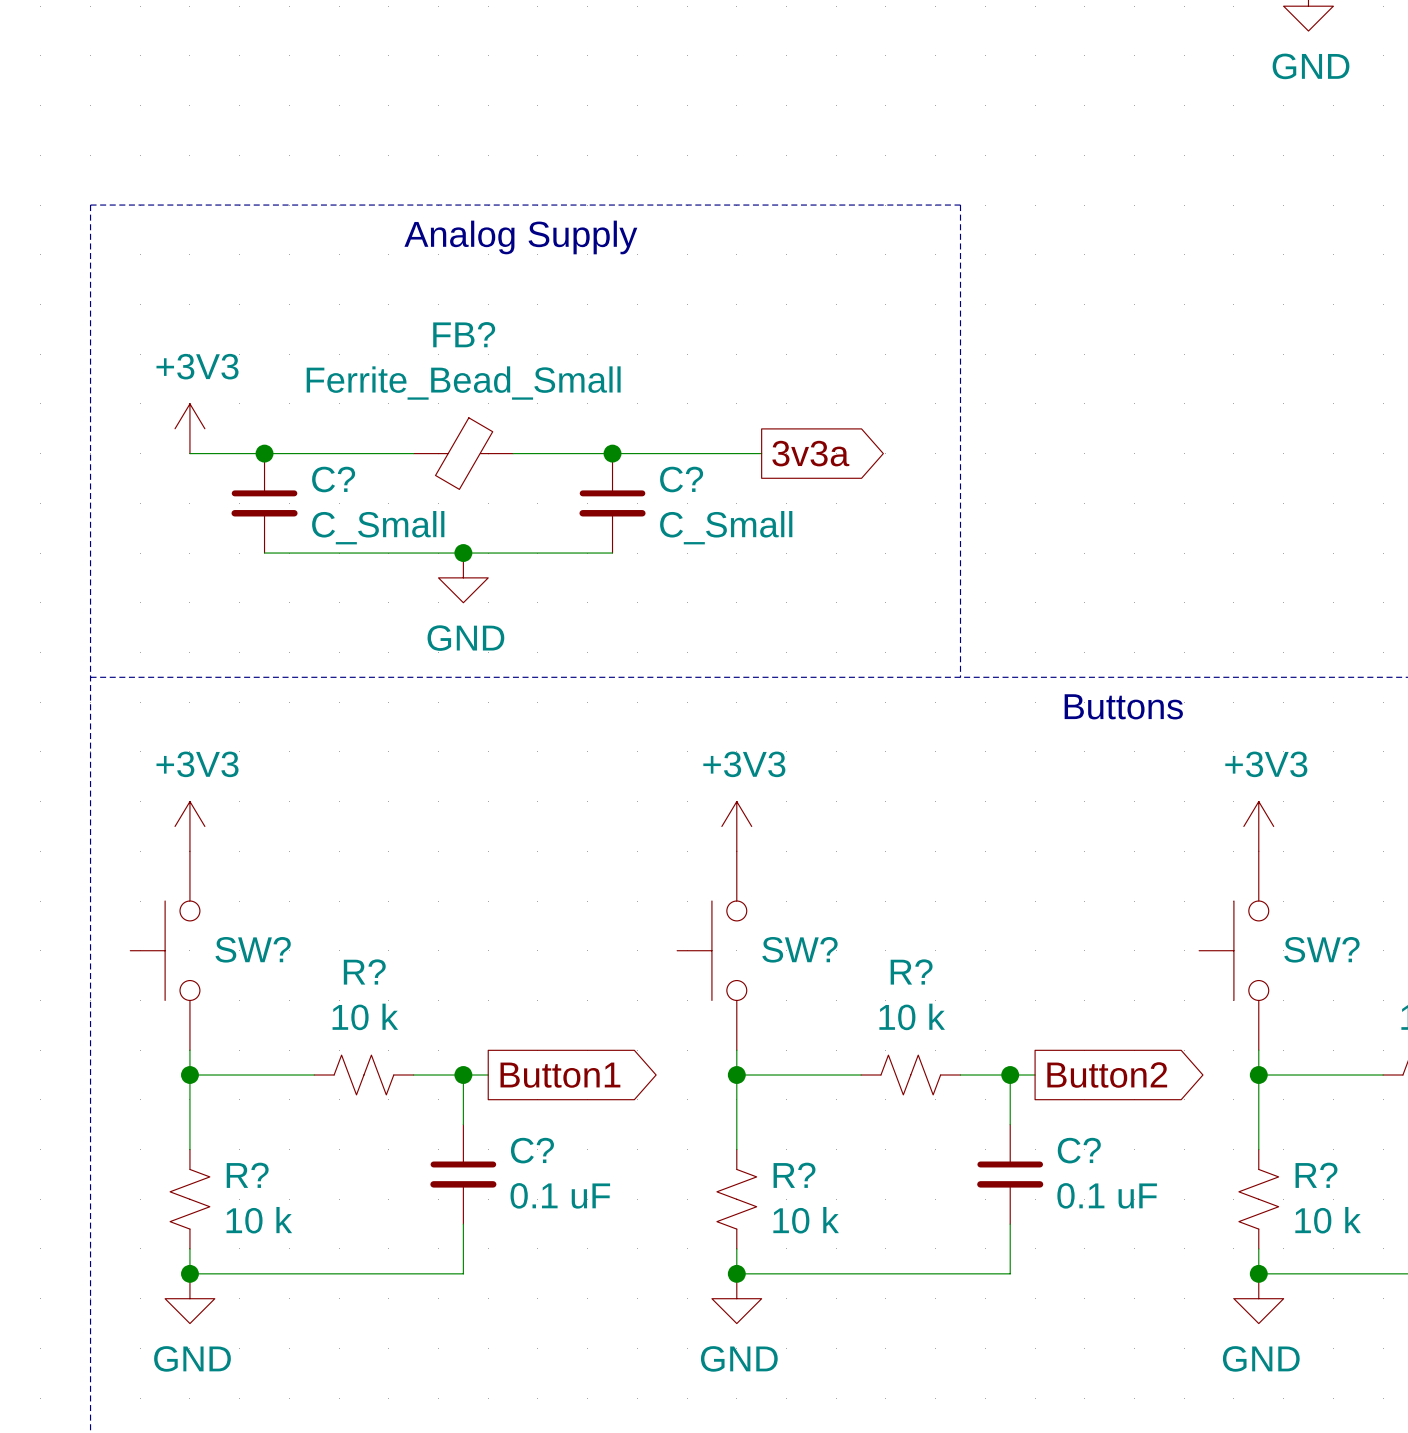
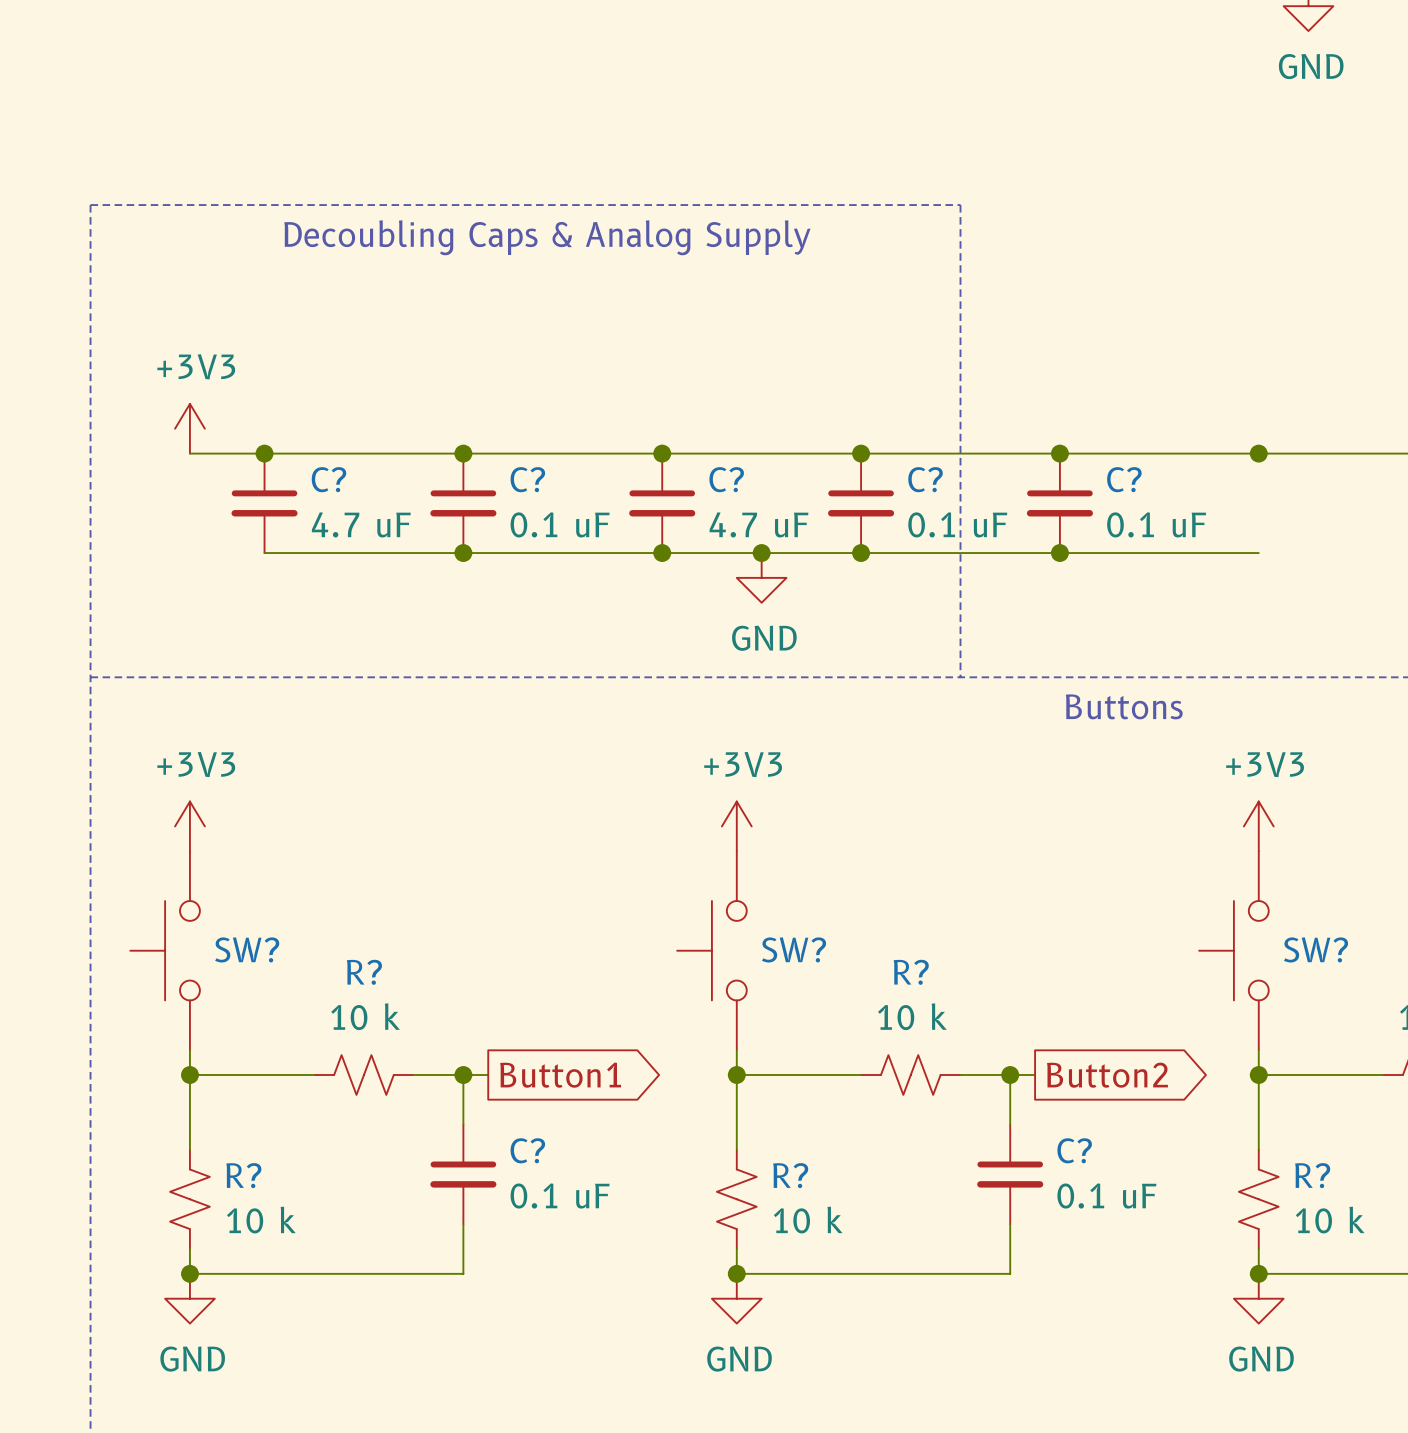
text: Analog Supply (520, 237) -> none
text: none -> Decoubling Caps & Analog Supply (547, 237)
FB?: Ferrite_Bead_Small (463, 453) -> none
junction: none -> (463, 453)
junction position: (612, 453) -> (662, 453)
wire: none -> (761, 453) (1407, 453)
global label: 3v3a (810, 453) -> none
junction: none -> (861, 453)
junction: none -> (1059, 453)
junction: none -> (1258, 453)
C?: none -> 0.1 uF (463, 503)
C?: C_Small (612, 503) -> none
C?: none -> 4.7 uF (662, 503)
C?: none -> 0.1 uF (861, 503)
C?: none -> 0.1 uF (1059, 503)
C? value: C_Small (378, 527) -> 4.7 uF (361, 524)
wire: none -> (612, 553) (1258, 553)
junction: none -> (662, 553)
junction: none -> (761, 553)
junction: none -> (861, 553)
junction: none -> (1059, 553)
power symbol position: GND (463, 577) -> GND (761, 577)

